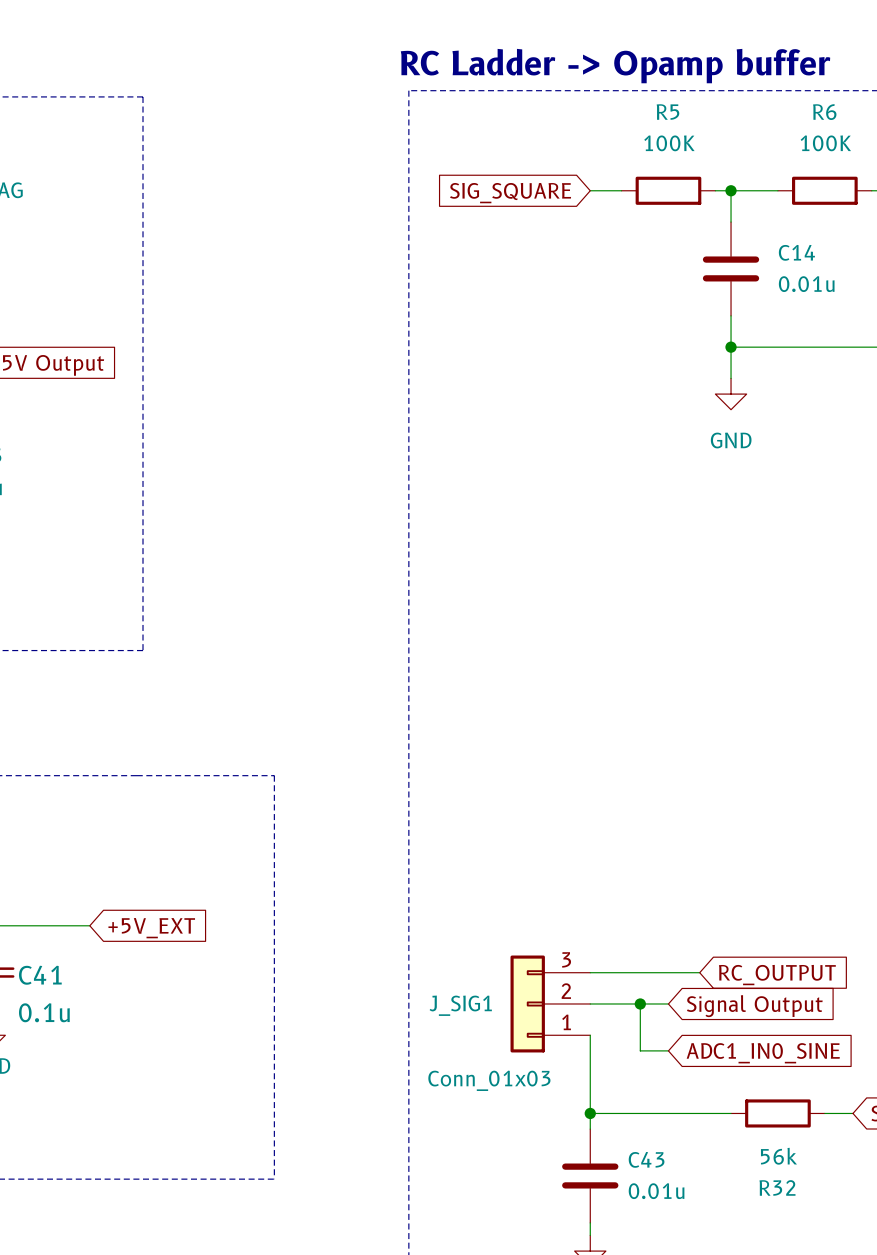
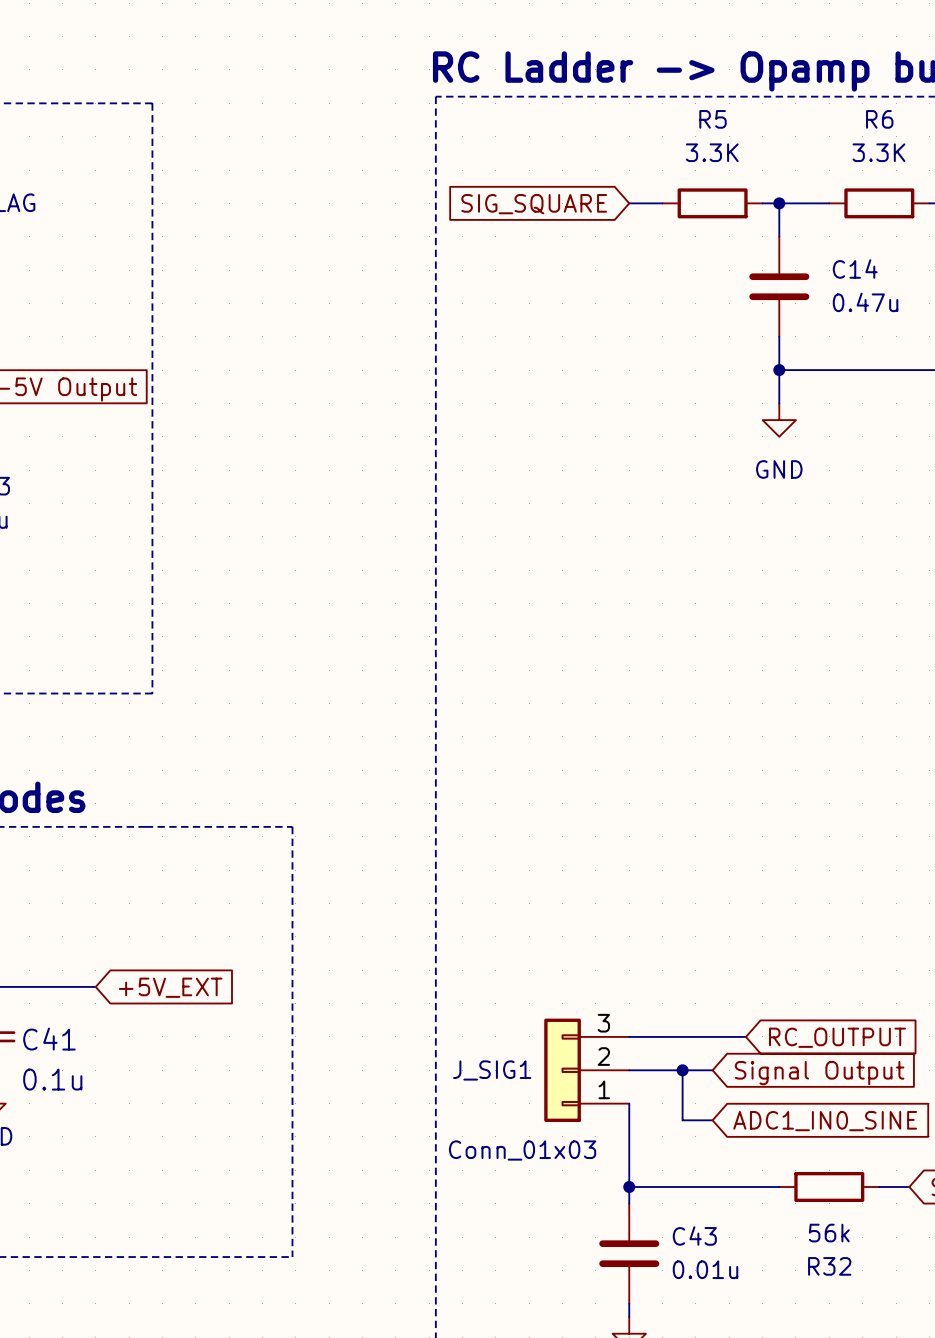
R5 value: 100K (669, 143) -> 3.3K (712, 152)
R6 value: 100K (825, 143) -> 3.3K (878, 152)
C14 value: 0.01u (806, 284) -> 0.47u (865, 302)

